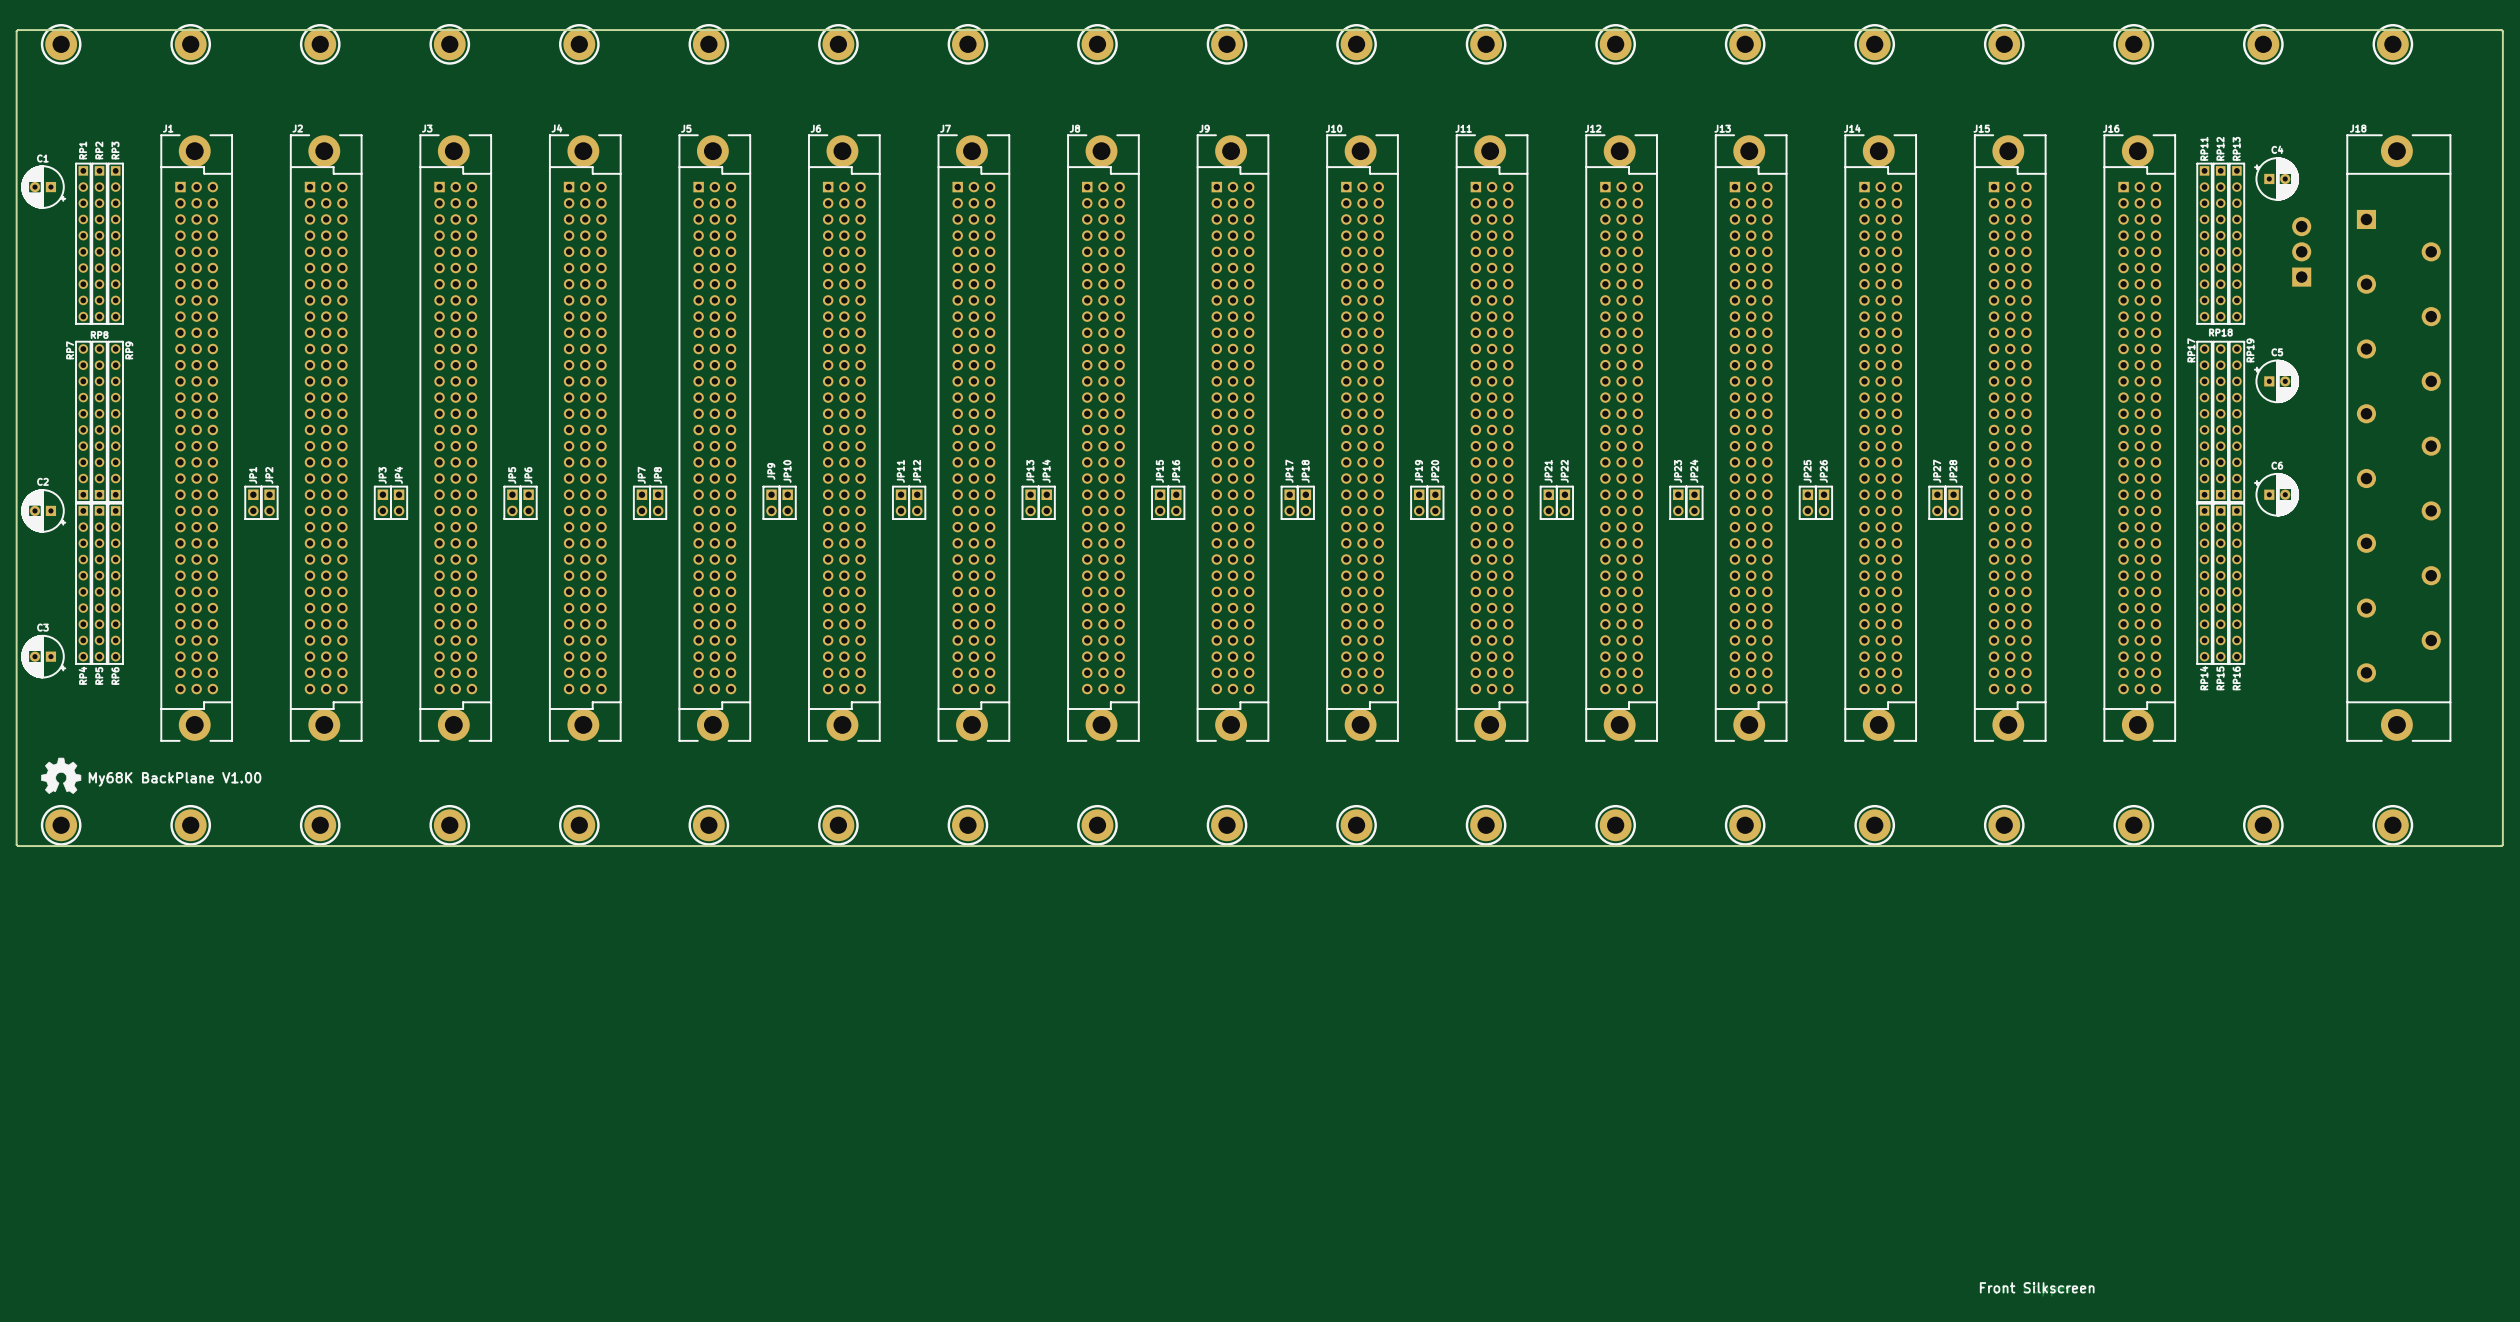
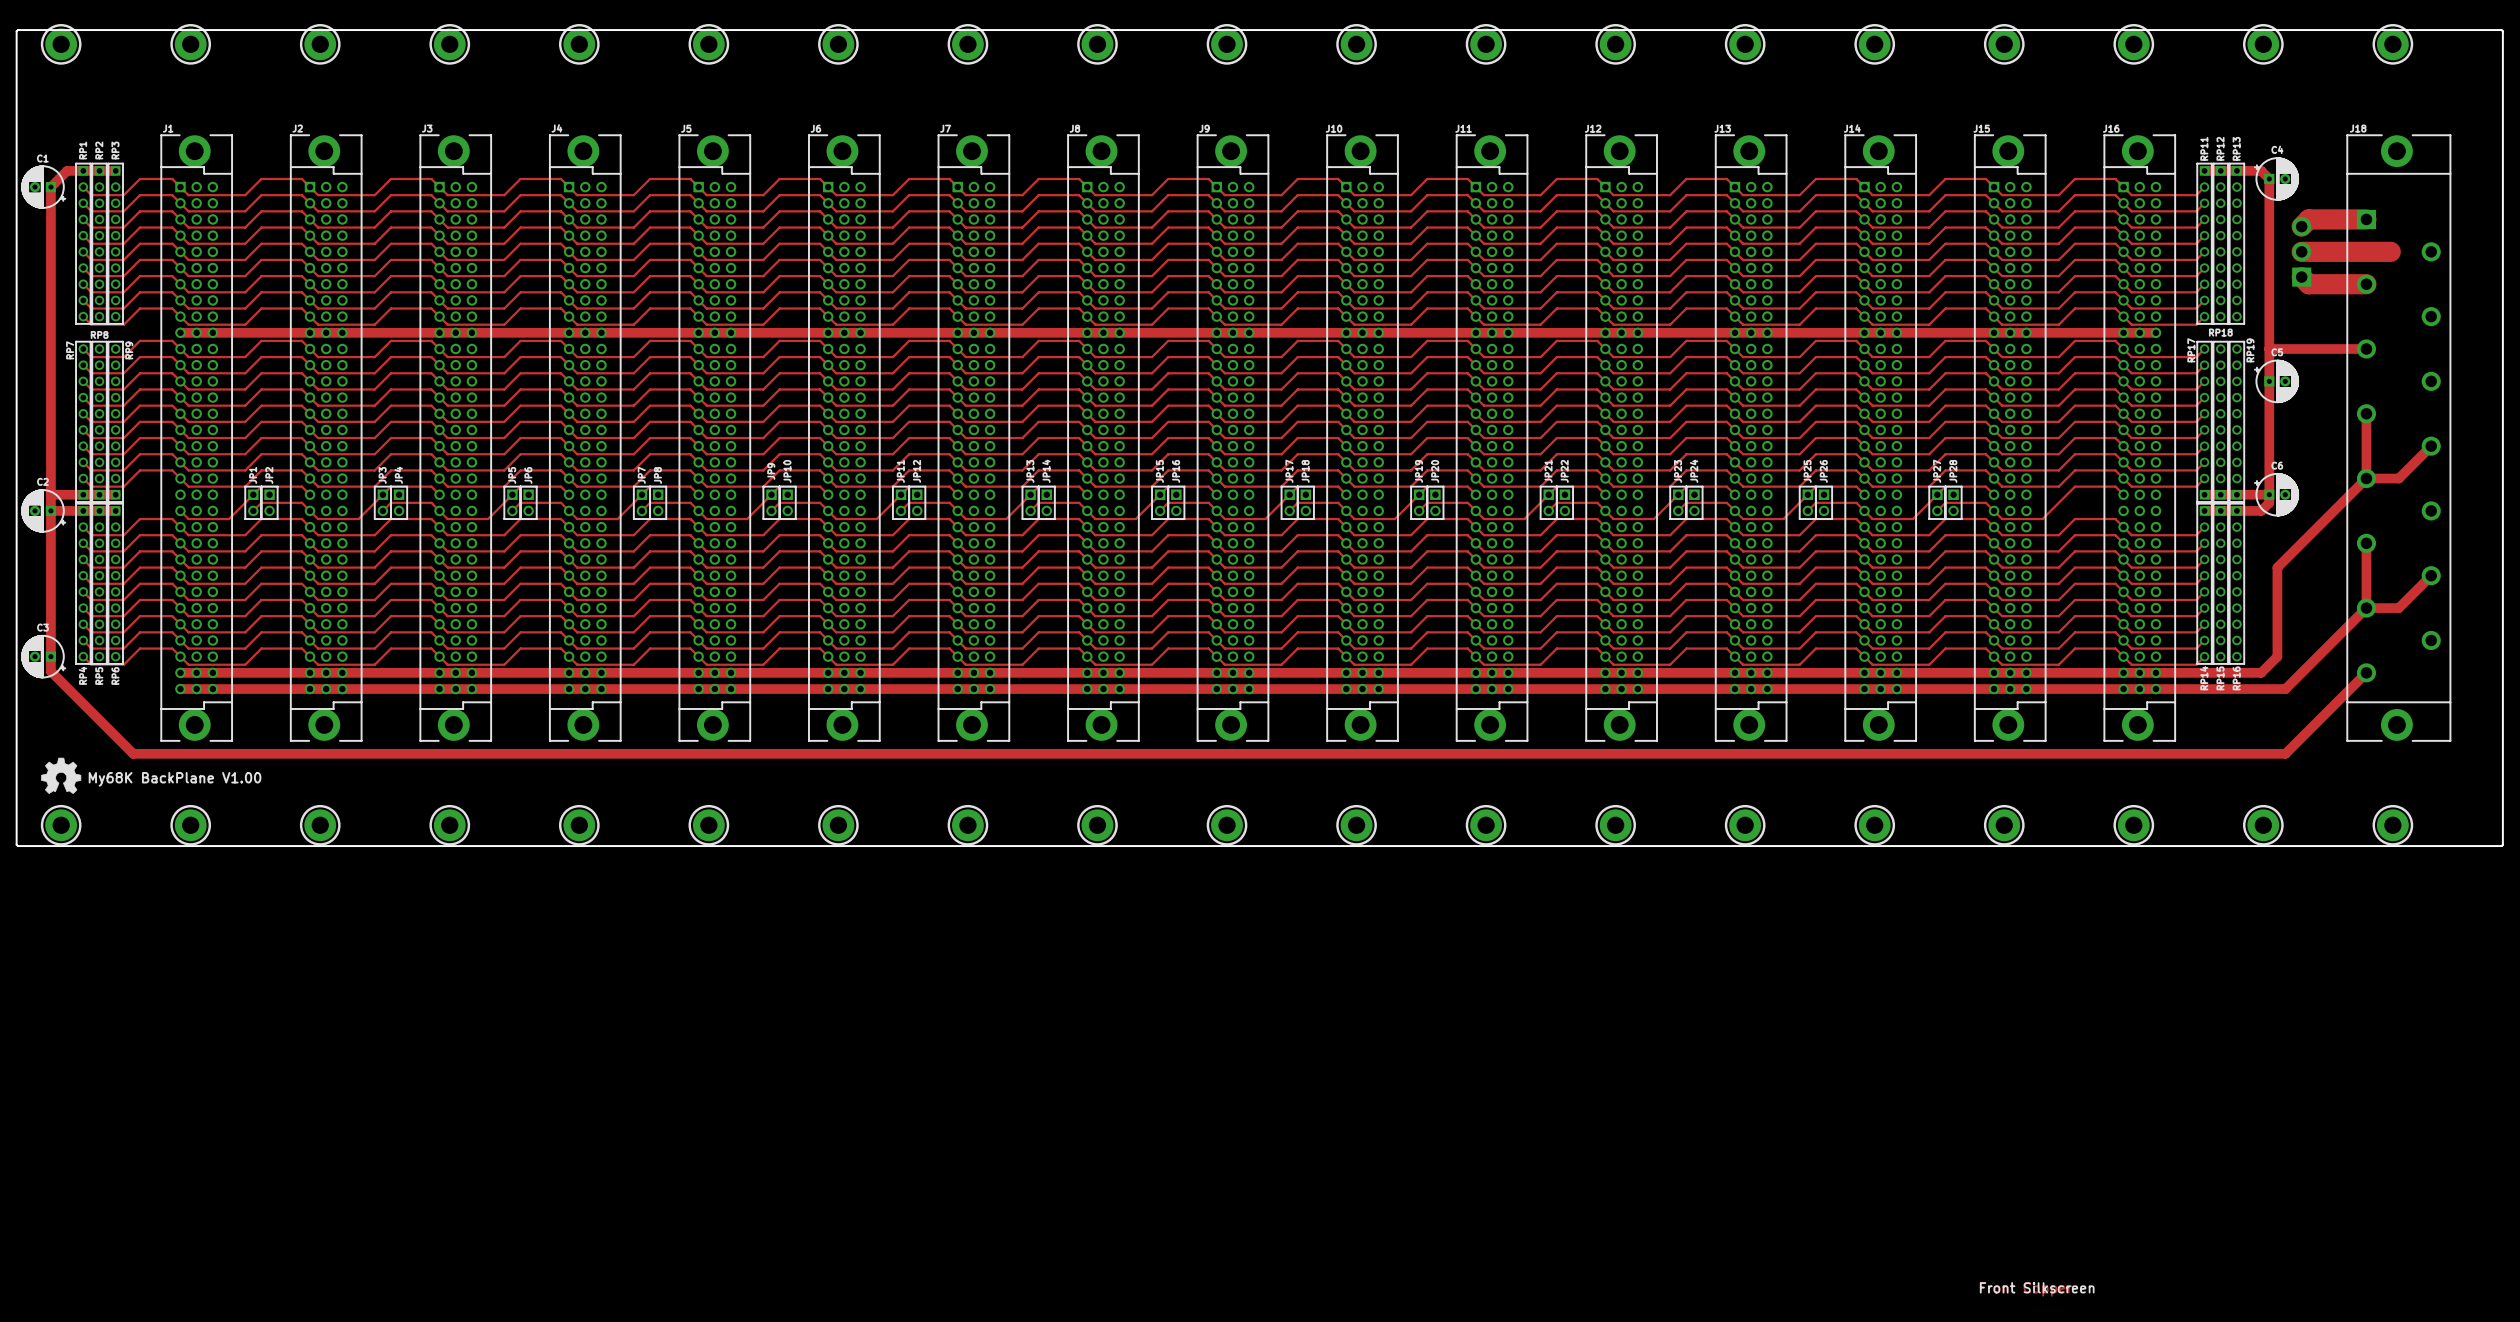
track: none -> (115, 170) (67, 170) (50, 187) (50, 671) (133, 753) (2285, 753) (2366, 672)
track: none -> (2204, 170) (2261, 170) (2269, 178) (2269, 502) (2261, 510) (2204, 510)
track: none -> (83, 187) (91, 195) (123, 195) (139, 178) (172, 178) (188, 195) (245, 195) (261, 178) (301, 178) (318, 195) (374, 195) (390, 178) (431, 178) (447, 195) (504, 195) (520, 178) (560, 178) (577, 195) (633, 195) (650, 178) (690, 178) (706, 195) (763, 195) (779, 178) (820, 178) (836, 195) (892, 195) (909, 178) (949, 178) (965, 195) (1022, 195) (1038, 178) (1079, 178) (1095, 195) (1152, 195) (1168, 178) (1208, 178) (1224, 195) (1281, 195) (1297, 178) (1338, 178) (1354, 195) (1411, 195) (1427, 178) (1467, 178) (1483, 195) (1540, 195) (1556, 178) (1597, 178) (1613, 195) (1670, 195) (1686, 178) (1726, 178) (1743, 195) (1799, 195) (1815, 178) (1856, 178) (1872, 195) (1929, 195) (1945, 178) (1985, 178) (2002, 195) (2058, 195) (2075, 178) (2115, 178) (2131, 195) (2196, 195) (2204, 187)
track: none -> (83, 203) (91, 211) (123, 211) (139, 195) (172, 195) (188, 211) (245, 211) (261, 195) (301, 195) (318, 211) (374, 211) (390, 195) (431, 195) (447, 211) (504, 211) (520, 195) (560, 195) (577, 211) (633, 211) (650, 195) (690, 195) (706, 211) (763, 211) (779, 195) (820, 195) (836, 211) (892, 211) (909, 195) (949, 195) (965, 211) (1022, 211) (1038, 195) (1079, 195) (1095, 211) (1152, 211) (1168, 195) (1208, 195) (1224, 211) (1281, 211) (1297, 195) (1338, 195) (1354, 211) (1411, 211) (1427, 195) (1467, 195) (1483, 211) (1540, 211) (1556, 195) (1597, 195) (1613, 211) (1670, 211) (1686, 195) (1726, 195) (1743, 211) (1799, 211) (1815, 195) (1856, 195) (1872, 211) (1929, 211) (1945, 195) (1985, 195) (2002, 211) (2058, 211) (2075, 195) (2115, 195) (2131, 211) (2196, 211) (2204, 203)
track: none -> (83, 219) (91, 227) (123, 227) (139, 211) (172, 211) (188, 227) (245, 227) (261, 211) (301, 211) (318, 227) (374, 227) (390, 211) (431, 211) (447, 227) (504, 227) (520, 211) (560, 211) (577, 227) (633, 227) (650, 211) (690, 211) (706, 227) (763, 227) (779, 211) (820, 211) (836, 227) (892, 227) (909, 211) (949, 211) (965, 227) (1022, 227) (1038, 211) (1079, 211) (1095, 227) (1152, 227) (1168, 211) (1208, 211) (1224, 227) (1281, 227) (1297, 211) (1338, 211) (1354, 227) (1411, 227) (1427, 211) (1467, 211) (1483, 227) (1540, 227) (1556, 211) (1597, 211) (1613, 227) (1670, 227) (1686, 211) (1726, 211) (1743, 227) (1799, 227) (1815, 211) (1856, 211) (1872, 227) (1929, 227) (1945, 211) (1985, 211) (2002, 227) (2058, 227) (2075, 211) (2115, 211) (2131, 227) (2196, 227) (2204, 219)
track: none -> (2366, 219) (2308, 219) (2301, 226)
track: none -> (83, 235) (91, 243) (123, 243) (139, 227) (172, 227) (188, 243) (245, 243) (261, 227) (301, 227) (318, 243) (374, 243) (390, 227) (431, 227) (447, 243) (504, 243) (520, 227) (560, 227) (577, 243) (633, 243) (650, 227) (690, 227) (706, 243) (763, 243) (779, 227) (820, 227) (836, 243) (892, 243) (909, 227) (949, 227) (965, 243) (1022, 243) (1038, 227) (1079, 227) (1095, 243) (1152, 243) (1168, 227) (1208, 227) (1224, 243) (1281, 243) (1297, 227) (1338, 227) (1354, 243) (1411, 243) (1427, 227) (1467, 227) (1483, 243) (1540, 243) (1556, 227) (1597, 227) (1613, 243) (1670, 243) (1686, 227) (1726, 227) (1743, 243) (1799, 243) (1815, 227) (1856, 227) (1872, 243) (1929, 243) (1945, 227) (1985, 227) (2002, 243) (2058, 243) (2075, 227) (2115, 227) (2131, 243) (2196, 243) (2204, 235)
track: none -> (83, 251) (91, 259) (123, 259) (139, 243) (172, 243) (188, 259) (245, 259) (261, 243) (301, 243) (318, 259) (374, 259) (390, 243) (431, 243) (447, 259) (504, 259) (520, 243) (560, 243) (577, 259) (633, 259) (650, 243) (690, 243) (706, 259) (763, 259) (779, 243) (820, 243) (836, 259) (892, 259) (909, 243) (949, 243) (965, 259) (1022, 259) (1038, 243) (1079, 243) (1095, 259) (1152, 259) (1168, 243) (1208, 243) (1224, 259) (1281, 259) (1297, 243) (1338, 243) (1354, 259) (1411, 259) (1427, 243) (1467, 243) (1483, 259) (1540, 259) (1556, 243) (1597, 243) (1613, 259) (1670, 259) (1686, 243) (1726, 243) (1743, 259) (1799, 259) (1815, 243) (1856, 243) (1872, 259) (1929, 259) (1945, 243) (1985, 243) (2002, 259) (2058, 259) (2075, 243) (2115, 243) (2131, 259) (2196, 259) (2204, 251)
track: none -> (2301, 251) (2390, 251)
track: none -> (83, 268) (91, 276) (123, 276) (139, 259) (172, 259) (188, 276) (245, 276) (261, 259) (301, 259) (318, 276) (374, 276) (390, 259) (431, 259) (447, 276) (504, 276) (520, 259) (560, 259) (577, 276) (633, 276) (650, 259) (690, 259) (706, 276) (763, 276) (779, 259) (820, 259) (836, 276) (892, 276) (909, 259) (949, 259) (965, 276) (1022, 276) (1038, 259) (1079, 259) (1095, 276) (1152, 276) (1168, 259) (1208, 259) (1224, 276) (1281, 276) (1297, 259) (1338, 259) (1354, 276) (1411, 276) (1427, 259) (1467, 259) (1483, 276) (1540, 276) (1556, 259) (1597, 259) (1613, 276) (1670, 276) (1686, 259) (1726, 259) (1743, 276) (1799, 276) (1815, 259) (1856, 259) (1872, 276) (1929, 276) (1945, 259) (1985, 259) (2002, 276) (2058, 276) (2075, 259) (2115, 259) (2131, 276) (2196, 276) (2204, 268)
track: none -> (2301, 277) (2308, 284) (2366, 284)
track: none -> (83, 284) (91, 292) (123, 292) (139, 276) (172, 276) (188, 292) (245, 292) (261, 276) (301, 276) (318, 292) (374, 292) (390, 276) (431, 276) (447, 292) (504, 292) (520, 276) (560, 276) (577, 292) (633, 292) (650, 276) (690, 276) (706, 292) (763, 292) (779, 276) (820, 276) (836, 292) (892, 292) (909, 276) (949, 276) (965, 292) (1022, 292) (1038, 276) (1079, 276) (1095, 292) (1152, 292) (1168, 276) (1208, 276) (1224, 292) (1281, 292) (1297, 276) (1338, 276) (1354, 292) (1411, 292) (1427, 276) (1467, 276) (1483, 292) (1540, 292) (1556, 276) (1597, 276) (1613, 292) (1670, 292) (1686, 276) (1726, 276) (1743, 292) (1799, 292) (1815, 276) (1856, 276) (1872, 292) (1929, 292) (1945, 276) (1985, 276) (2002, 292) (2058, 292) (2075, 276) (2115, 276) (2131, 292) (2196, 292) (2204, 284)
track: none -> (83, 300) (91, 308) (123, 308) (139, 292) (172, 292) (188, 308) (245, 308) (261, 292) (301, 292) (318, 308) (374, 308) (390, 292) (431, 292) (447, 308) (504, 308) (520, 292) (560, 292) (577, 308) (633, 308) (650, 292) (690, 292) (706, 308) (763, 308) (779, 292) (820, 292) (836, 308) (892, 308) (909, 292) (949, 292) (965, 308) (1022, 308) (1038, 292) (1079, 292) (1095, 308) (1152, 308) (1168, 292) (1208, 292) (1224, 308) (1281, 308) (1297, 292) (1338, 292) (1354, 308) (1411, 308) (1427, 292) (1467, 292) (1483, 308) (1540, 308) (1556, 292) (1597, 292) (1613, 308) (1670, 308) (1686, 292) (1726, 292) (1743, 308) (1799, 308) (1815, 292) (1856, 292) (1872, 308) (1929, 308) (1945, 292) (1985, 292) (2002, 308) (2058, 308) (2075, 292) (2115, 292) (2131, 308) (2196, 308) (2204, 300)
track: none -> (83, 316) (91, 324) (123, 324) (139, 308) (172, 308) (188, 324) (245, 324) (261, 308) (301, 308) (318, 324) (374, 324) (390, 308) (431, 308) (447, 324) (504, 324) (520, 308) (560, 308) (577, 324) (633, 324) (650, 308) (690, 308) (706, 324) (763, 324) (779, 308) (820, 308) (836, 324) (892, 324) (909, 308) (949, 308) (965, 324) (1022, 324) (1038, 308) (1079, 308) (1095, 324) (1152, 324) (1168, 308) (1208, 308) (1224, 324) (1281, 324) (1297, 308) (1338, 308) (1354, 324) (1411, 324) (1427, 308) (1467, 308) (1483, 324) (1540, 324) (1556, 308) (1597, 308) (1613, 324) (1670, 324) (1686, 308) (1726, 308) (1743, 324) (1799, 324) (1815, 308) (1856, 308) (1872, 324) (1929, 324) (1945, 308) (1985, 308) (2002, 324) (2058, 324) (2075, 308) (2115, 308) (2131, 324) (2196, 324) (2204, 316)
track: none -> (180, 332) (2155, 332)
track: none -> (83, 349) (91, 357) (123, 357) (139, 340) (172, 340) (188, 357) (245, 357) (261, 340) (301, 340) (318, 357) (374, 357) (390, 340) (431, 340) (447, 357) (504, 357) (520, 340) (560, 340) (577, 357) (633, 357) (650, 340) (690, 340) (706, 357) (763, 357) (779, 340) (820, 340) (836, 357) (892, 357) (909, 340) (949, 340) (965, 357) (1022, 357) (1038, 340) (1079, 340) (1095, 357) (1152, 357) (1168, 340) (1208, 340) (1224, 357) (1281, 357) (1297, 340) (1338, 340) (1354, 357) (1411, 357) (1427, 340) (1467, 340) (1483, 357) (1540, 357) (1556, 340) (1597, 340) (1613, 357) (1670, 357) (1686, 340) (1726, 340) (1743, 357) (1799, 357) (1815, 340) (1856, 340) (1872, 357) (1929, 357) (1945, 340) (1985, 340) (2002, 357) (2058, 357) (2075, 340) (2115, 340) (2131, 357) (2196, 357) (2204, 349)
track: none -> (2269, 349) (2366, 349)
track: none -> (83, 365) (91, 373) (123, 373) (139, 357) (172, 357) (188, 373) (245, 373) (261, 357) (301, 357) (318, 373) (374, 373) (390, 357) (431, 357) (447, 373) (504, 373) (520, 357) (560, 357) (577, 373) (633, 373) (650, 357) (690, 357) (706, 373) (763, 373) (779, 357) (820, 357) (836, 373) (892, 373) (909, 357) (949, 357) (965, 373) (1022, 373) (1038, 357) (1079, 357) (1095, 373) (1152, 373) (1168, 357) (1208, 357) (1224, 373) (1281, 373) (1297, 357) (1338, 357) (1354, 373) (1411, 373) (1427, 357) (1467, 357) (1483, 373) (1540, 373) (1556, 357) (1597, 357) (1613, 373) (1670, 373) (1686, 357) (1726, 357) (1743, 373) (1799, 373) (1815, 357) (1856, 357) (1872, 373) (1929, 373) (1945, 357) (1985, 357) (2002, 373) (2058, 373) (2075, 357) (2115, 357) (2131, 373) (2196, 373) (2204, 365)
track: none -> (83, 381) (91, 389) (123, 389) (139, 373) (172, 373) (188, 389) (245, 389) (261, 373) (301, 373) (318, 389) (374, 389) (390, 373) (431, 373) (447, 389) (504, 389) (520, 373) (560, 373) (577, 389) (633, 389) (650, 373) (690, 373) (706, 389) (763, 389) (779, 373) (820, 373) (836, 389) (892, 389) (909, 373) (949, 373) (965, 389) (1022, 389) (1038, 373) (1079, 373) (1095, 389) (1152, 389) (1168, 373) (1208, 373) (1224, 389) (1281, 389) (1297, 373) (1338, 373) (1354, 389) (1411, 389) (1427, 373) (1467, 373) (1483, 389) (1540, 389) (1556, 373) (1597, 373) (1613, 389) (1670, 389) (1686, 373) (1726, 373) (1743, 389) (1799, 389) (1815, 373) (1856, 373) (1872, 389) (1929, 389) (1945, 373) (1985, 373) (2002, 389) (2058, 389) (2075, 373) (2115, 373) (2131, 389) (2196, 389) (2204, 381)
track: none -> (83, 397) (91, 405) (123, 405) (139, 389) (172, 389) (188, 405) (245, 405) (261, 389) (301, 389) (318, 405) (374, 405) (390, 389) (431, 389) (447, 405) (504, 405) (520, 389) (560, 389) (577, 405) (633, 405) (650, 389) (690, 389) (706, 405) (763, 405) (779, 389) (820, 389) (836, 405) (892, 405) (909, 389) (949, 389) (965, 405) (1022, 405) (1038, 389) (1079, 389) (1095, 405) (1152, 405) (1168, 389) (1208, 389) (1224, 405) (1281, 405) (1297, 389) (1338, 389) (1354, 405) (1411, 405) (1427, 389) (1467, 389) (1483, 405) (1540, 405) (1556, 389) (1597, 389) (1613, 405) (1670, 405) (1686, 389) (1726, 389) (1743, 405) (1799, 405) (1815, 389) (1856, 389) (1872, 405) (1929, 405) (1945, 389) (1985, 389) (2002, 405) (2058, 405) (2075, 389) (2115, 389) (2131, 405) (2196, 405) (2204, 397)
track: none -> (83, 413) (91, 421) (123, 421) (139, 405) (172, 405) (188, 421) (245, 421) (261, 405) (301, 405) (318, 421) (374, 421) (390, 405) (431, 405) (447, 421) (504, 421) (520, 405) (560, 405) (577, 421) (633, 421) (650, 405) (690, 405) (706, 421) (763, 421) (779, 405) (820, 405) (836, 421) (892, 421) (909, 405) (949, 405) (965, 421) (1022, 421) (1038, 405) (1079, 405) (1095, 421) (1152, 421) (1168, 405) (1208, 405) (1224, 421) (1281, 421) (1297, 405) (1338, 405) (1354, 421) (1411, 421) (1427, 405) (1467, 405) (1483, 421) (1540, 421) (1556, 405) (1597, 405) (1613, 421) (1670, 421) (1686, 405) (1726, 405) (1743, 421) (1799, 421) (1815, 405) (1856, 405) (1872, 421) (1929, 421) (1945, 405) (1985, 405) (2002, 421) (2058, 421) (2075, 405) (2115, 405) (2131, 421) (2196, 421) (2204, 413)
track: none -> (2366, 413) (2366, 478)
track: none -> (83, 429) (91, 438) (123, 438) (139, 421) (172, 421) (188, 438) (245, 438) (261, 421) (301, 421) (318, 438) (374, 438) (390, 421) (431, 421) (447, 438) (504, 438) (520, 421) (560, 421) (577, 438) (633, 438) (650, 421) (690, 421) (706, 438) (763, 438) (779, 421) (820, 421) (836, 438) (892, 438) (909, 421) (949, 421) (965, 438) (1022, 438) (1038, 421) (1079, 421) (1095, 438) (1152, 438) (1168, 421) (1208, 421) (1224, 438) (1281, 438) (1297, 421) (1338, 421) (1354, 438) (1411, 438) (1427, 421) (1467, 421) (1483, 438) (1540, 438) (1556, 421) (1597, 421) (1613, 438) (1670, 438) (1686, 421) (1726, 421) (1743, 438) (1799, 438) (1815, 421) (1856, 421) (1872, 438) (1929, 438) (1945, 421) (1985, 421) (2002, 438) (2058, 438) (2075, 421) (2115, 421) (2131, 438) (2196, 438) (2204, 429)
track: none -> (83, 446) (91, 454) (123, 454) (139, 438) (172, 438) (188, 454) (245, 454) (261, 438) (301, 438) (318, 454) (374, 454) (390, 438) (431, 438) (447, 454) (504, 454) (520, 438) (560, 438) (577, 454) (633, 454) (650, 438) (690, 438) (706, 454) (763, 454) (779, 438) (820, 438) (836, 454) (892, 454) (909, 438) (949, 438) (965, 454) (1022, 454) (1038, 438) (1079, 438) (1095, 454) (1152, 454) (1168, 438) (1208, 438) (1224, 454) (1281, 454) (1297, 438) (1338, 438) (1354, 454) (1411, 454) (1427, 438) (1467, 438) (1483, 454) (1540, 454) (1556, 438) (1597, 438) (1613, 454) (1670, 454) (1686, 438) (1726, 438) (1743, 454) (1799, 454) (1815, 438) (1856, 438) (1872, 454) (1929, 454) (1945, 438) (1985, 438) (2002, 454) (2058, 454) (2075, 438) (2115, 438) (2131, 454) (2196, 454) (2204, 446)
track: none -> (2431, 446) (2398, 478) (2366, 478)
track: none -> (83, 462) (91, 470) (123, 470) (139, 454) (172, 454) (188, 470) (245, 470) (261, 454) (301, 454) (318, 470) (374, 470) (390, 454) (431, 454) (447, 470) (504, 470) (520, 454) (560, 454) (577, 470) (633, 470) (650, 454) (690, 454) (706, 470) (763, 470) (779, 454) (820, 454) (836, 470) (892, 470) (909, 454) (949, 454) (965, 470) (1022, 470) (1038, 454) (1079, 454) (1095, 470) (1152, 470) (1168, 454) (1208, 454) (1224, 470) (1281, 470) (1297, 454) (1338, 454) (1354, 470) (1411, 470) (1427, 454) (1467, 454) (1483, 470) (1540, 470) (1556, 454) (1597, 454) (1613, 470) (1670, 470) (1686, 454) (1726, 454) (1743, 470) (1799, 470) (1815, 454) (1856, 454) (1872, 470) (1929, 470) (1945, 454) (1985, 454) (2002, 470) (2058, 470) (2075, 454) (2115, 454) (2131, 470) (2196, 470) (2204, 462)
track: none -> (83, 478) (91, 486) (123, 486) (139, 470) (172, 470) (188, 486) (245, 486) (261, 470) (301, 470) (318, 486) (374, 486) (390, 470) (431, 470) (447, 486) (504, 486) (520, 470) (560, 470) (577, 486) (633, 486) (650, 470) (690, 470) (706, 486) (763, 486) (779, 470) (820, 470) (836, 486) (892, 486) (909, 470) (949, 470) (965, 486) (1022, 486) (1038, 470) (1079, 470) (1095, 486) (1152, 486) (1168, 470) (1208, 470) (1224, 486) (1281, 486) (1297, 470) (1338, 470) (1354, 486) (1411, 486) (1427, 470) (1467, 470) (1483, 486) (1540, 486) (1556, 470) (1597, 470) (1613, 486) (1670, 486) (1686, 470) (1726, 470) (1743, 486) (1799, 486) (1815, 470) (1856, 470) (1872, 486) (1929, 486) (1945, 470) (1985, 470) (2002, 486) (2058, 486) (2075, 470) (2115, 470) (2131, 486) (2196, 486) (2204, 478)
track: none -> (2366, 478) (2277, 567) (2277, 656) (2261, 672) (180, 672)
track: none -> (50, 494) (115, 494)
track: none -> (310, 494) (301, 486) (261, 486) (229, 519) (188, 519) (180, 510)
track: none -> (439, 494) (431, 486) (390, 486) (358, 519) (318, 519) (301, 502) (261, 502) (253, 510)
track: none -> (569, 494) (560, 486) (520, 486) (488, 519) (447, 519) (431, 502) (390, 502) (382, 510)
track: none -> (698, 494) (690, 486) (650, 486) (617, 519) (577, 519) (560, 502) (520, 502) (512, 510)
track: none -> (828, 494) (820, 486) (779, 486) (747, 519) (706, 519) (690, 502) (650, 502) (641, 510)
track: none -> (957, 494) (949, 486) (909, 486) (876, 519) (836, 519) (820, 502) (779, 502) (771, 510)
track: none -> (1087, 494) (1079, 486) (1038, 486) (1006, 519) (965, 519) (949, 502) (909, 502) (901, 510)
track: none -> (1216, 494) (1208, 486) (1168, 486) (1135, 519) (1095, 519) (1079, 502) (1038, 502) (1030, 510)
track: none -> (1346, 494) (1338, 486) (1297, 486) (1265, 519) (1224, 519) (1208, 502) (1168, 502) (1160, 510)
track: none -> (1475, 494) (1467, 486) (1427, 486) (1394, 519) (1354, 519) (1338, 502) (1297, 502) (1289, 510)
track: none -> (1605, 494) (1597, 486) (1556, 486) (1524, 519) (1483, 519) (1467, 502) (1427, 502) (1419, 510)
track: none -> (1734, 494) (1726, 486) (1686, 486) (1653, 519) (1613, 519) (1597, 502) (1556, 502) (1548, 510)
track: none -> (1864, 494) (1856, 486) (1815, 486) (1783, 519) (1743, 519) (1726, 502) (1686, 502) (1678, 510)
track: none -> (1994, 494) (1985, 486) (1945, 486) (1913, 519) (1872, 519) (1856, 502) (1815, 502) (1807, 510)
track: none -> (2123, 494) (2115, 486) (2075, 486) (2042, 519) (2002, 519) (1985, 502) (1945, 502) (1937, 510)
track: none -> (2204, 494) (2269, 494)
track: none -> (50, 510) (115, 510)
track: none -> (83, 527) (91, 535) (123, 535) (139, 519) (172, 519) (188, 535) (245, 535) (261, 519) (301, 519) (318, 535) (374, 535) (390, 519) (431, 519) (447, 535) (504, 535) (520, 519) (560, 519) (577, 535) (633, 535) (650, 519) (690, 519) (706, 535) (763, 535) (779, 519) (820, 519) (836, 535) (892, 535) (909, 519) (949, 519) (965, 535) (1022, 535) (1038, 519) (1079, 519) (1095, 535) (1152, 535) (1168, 519) (1208, 519) (1224, 535) (1281, 535) (1297, 519) (1338, 519) (1354, 535) (1411, 535) (1427, 519) (1467, 519) (1483, 535) (1540, 535) (1556, 519) (1597, 519) (1613, 535) (1670, 535) (1686, 519) (1726, 519) (1743, 535) (1799, 535) (1815, 519) (1856, 519) (1872, 535) (1929, 535) (1945, 519) (1985, 519) (2002, 535) (2058, 535) (2075, 519) (2115, 519) (2131, 535) (2196, 535) (2204, 527)
track: none -> (83, 543) (91, 551) (123, 551) (139, 535) (172, 535) (188, 551) (245, 551) (261, 535) (301, 535) (318, 551) (374, 551) (390, 535) (431, 535) (447, 551) (504, 551) (520, 535) (560, 535) (577, 551) (633, 551) (650, 535) (690, 535) (706, 551) (763, 551) (779, 535) (820, 535) (836, 551) (892, 551) (909, 535) (949, 535) (965, 551) (1022, 551) (1038, 535) (1079, 535) (1095, 551) (1152, 551) (1168, 535) (1208, 535) (1224, 551) (1281, 551) (1297, 535) (1338, 535) (1354, 551) (1411, 551) (1427, 535) (1467, 535) (1483, 551) (1540, 551) (1556, 535) (1597, 535) (1613, 551) (1670, 551) (1686, 535) (1726, 535) (1743, 551) (1799, 551) (1815, 535) (1856, 535) (1872, 551) (1929, 551) (1945, 535) (1985, 535) (2002, 551) (2058, 551) (2075, 535) (2115, 535) (2131, 551) (2196, 551) (2204, 543)
track: none -> (2366, 543) (2366, 608)
track: none -> (83, 559) (91, 567) (123, 567) (139, 551) (172, 551) (188, 567) (245, 567) (261, 551) (301, 551) (318, 567) (374, 567) (390, 551) (431, 551) (447, 567) (504, 567) (520, 551) (560, 551) (577, 567) (633, 567) (650, 551) (690, 551) (706, 567) (763, 567) (779, 551) (820, 551) (836, 567) (892, 567) (909, 551) (949, 551) (965, 567) (1022, 567) (1038, 551) (1079, 551) (1095, 567) (1152, 567) (1168, 551) (1208, 551) (1224, 567) (1281, 567) (1297, 551) (1338, 551) (1354, 567) (1411, 567) (1427, 551) (1467, 551) (1483, 567) (1540, 567) (1556, 551) (1597, 551) (1613, 567) (1670, 567) (1686, 551) (1726, 551) (1743, 567) (1799, 567) (1815, 551) (1856, 551) (1872, 567) (1929, 567) (1945, 551) (1985, 551) (2002, 567) (2058, 567) (2075, 551) (2115, 551) (2131, 567) (2196, 567) (2204, 559)
track: none -> (83, 575) (91, 583) (123, 583) (139, 567) (172, 567) (188, 583) (245, 583) (261, 567) (301, 567) (318, 583) (374, 583) (390, 567) (431, 567) (447, 583) (504, 583) (520, 567) (560, 567) (577, 583) (633, 583) (650, 567) (690, 567) (706, 583) (763, 583) (779, 567) (820, 567) (836, 583) (892, 583) (909, 567) (949, 567) (965, 583) (1022, 583) (1038, 567) (1079, 567) (1095, 583) (1152, 583) (1168, 567) (1208, 567) (1224, 583) (1281, 583) (1297, 567) (1338, 567) (1354, 583) (1411, 583) (1427, 567) (1467, 567) (1483, 583) (1540, 583) (1556, 567) (1597, 567) (1613, 583) (1670, 583) (1686, 567) (1726, 567) (1743, 583) (1799, 583) (1815, 567) (1856, 567) (1872, 583) (1929, 583) (1945, 567) (1985, 567) (2002, 583) (2058, 583) (2075, 567) (2115, 567) (2131, 583) (2196, 583) (2204, 575)
track: none -> (2431, 575) (2398, 608) (2366, 608)
track: none -> (83, 591) (91, 599) (123, 599) (139, 583) (172, 583) (188, 599) (245, 599) (261, 583) (301, 583) (318, 599) (374, 599) (390, 583) (431, 583) (447, 599) (504, 599) (520, 583) (560, 583) (577, 599) (633, 599) (650, 583) (690, 583) (706, 599) (763, 599) (779, 583) (820, 583) (836, 599) (892, 599) (909, 583) (949, 583) (965, 599) (1022, 599) (1038, 583) (1079, 583) (1095, 599) (1152, 599) (1168, 583) (1208, 583) (1224, 599) (1281, 599) (1297, 583) (1338, 583) (1354, 599) (1411, 599) (1427, 583) (1467, 583) (1483, 599) (1540, 599) (1556, 583) (1597, 583) (1613, 599) (1670, 599) (1686, 583) (1726, 583) (1743, 599) (1799, 599) (1815, 583) (1856, 583) (1872, 599) (1929, 599) (1945, 583) (1985, 583) (2002, 599) (2058, 599) (2075, 583) (2115, 583) (2131, 599) (2196, 599) (2204, 591)
track: none -> (83, 608) (91, 616) (123, 616) (139, 599) (172, 599) (188, 616) (245, 616) (261, 599) (301, 599) (318, 616) (374, 616) (390, 599) (431, 599) (447, 616) (504, 616) (520, 599) (560, 599) (577, 616) (633, 616) (650, 599) (690, 599) (706, 616) (763, 616) (779, 599) (820, 599) (836, 616) (892, 616) (909, 599) (949, 599) (965, 616) (1022, 616) (1038, 599) (1079, 599) (1095, 616) (1152, 616) (1168, 599) (1208, 599) (1224, 616) (1281, 616) (1297, 599) (1338, 599) (1354, 616) (1411, 616) (1427, 599) (1467, 599) (1483, 616) (1540, 616) (1556, 599) (1597, 599) (1613, 616) (1670, 616) (1686, 599) (1726, 599) (1743, 616) (1799, 616) (1815, 599) (1856, 599) (1872, 616) (1929, 616) (1945, 599) (1985, 599) (2002, 616) (2058, 616) (2075, 599) (2115, 599) (2131, 616) (2196, 616) (2204, 608)
track: none -> (2366, 608) (2285, 689) (180, 689)
track: none -> (83, 624) (91, 632) (123, 632) (139, 616) (172, 616) (188, 632) (245, 632) (261, 616) (301, 616) (318, 632) (374, 632) (390, 616) (431, 616) (447, 632) (504, 632) (520, 616) (560, 616) (577, 632) (633, 632) (650, 616) (690, 616) (706, 632) (763, 632) (779, 616) (820, 616) (836, 632) (892, 632) (909, 616) (949, 616) (965, 632) (1022, 632) (1038, 616) (1079, 616) (1095, 632) (1152, 632) (1168, 616) (1208, 616) (1224, 632) (1281, 632) (1297, 616) (1338, 616) (1354, 632) (1411, 632) (1427, 616) (1467, 616) (1483, 632) (1540, 632) (1556, 616) (1597, 616) (1613, 632) (1670, 632) (1686, 616) (1726, 616) (1743, 632) (1799, 632) (1815, 616) (1856, 616) (1872, 632) (1929, 632) (1945, 616) (1985, 616) (2002, 632) (2058, 632) (2075, 616) (2115, 616) (2131, 632) (2196, 632) (2204, 624)
track: none -> (83, 640) (91, 648) (123, 648) (139, 632) (172, 632) (188, 648) (245, 648) (261, 632) (301, 632) (318, 648) (374, 648) (390, 632) (431, 632) (447, 648) (504, 648) (520, 632) (560, 632) (577, 648) (633, 648) (650, 632) (690, 632) (706, 648) (763, 648) (779, 632) (820, 632) (836, 648) (892, 648) (909, 632) (949, 632) (965, 648) (1022, 648) (1038, 632) (1079, 632) (1095, 648) (1152, 648) (1168, 632) (1208, 632) (1224, 648) (1281, 648) (1297, 632) (1338, 632) (1354, 648) (1411, 648) (1427, 632) (1467, 632) (1483, 648) (1540, 648) (1556, 632) (1597, 632) (1613, 648) (1670, 648) (1686, 632) (1726, 632) (1743, 648) (1799, 648) (1815, 632) (1856, 632) (1872, 648) (1929, 648) (1945, 632) (1985, 632) (2002, 648) (2058, 648) (2075, 632) (2115, 632) (2131, 648) (2196, 648) (2204, 640)
track: none -> (83, 656) (91, 664) (123, 664) (139, 648) (172, 648) (188, 664) (245, 664) (261, 648) (301, 648) (318, 664) (374, 664) (390, 648) (431, 648) (447, 664) (504, 664) (520, 648) (560, 648) (577, 664) (633, 664) (650, 648) (690, 648) (706, 664) (763, 664) (779, 648) (820, 648) (836, 664) (892, 664) (909, 648) (949, 648) (965, 664) (1022, 664) (1038, 648) (1079, 648) (1095, 664) (1152, 664) (1168, 648) (1208, 648) (1224, 664) (1281, 664) (1297, 648) (1338, 648) (1354, 664) (1411, 664) (1427, 648) (1467, 648) (1483, 664) (1540, 664) (1556, 648) (1597, 648) (1613, 664) (1670, 664) (1686, 648) (1726, 648) (1743, 664) (1799, 664) (1815, 648) (1856, 648) (1872, 664) (1929, 664) (1945, 648) (1985, 648) (2002, 664) (2058, 664) (2075, 648) (2115, 648) (2131, 664) (2196, 664) (2204, 656)

